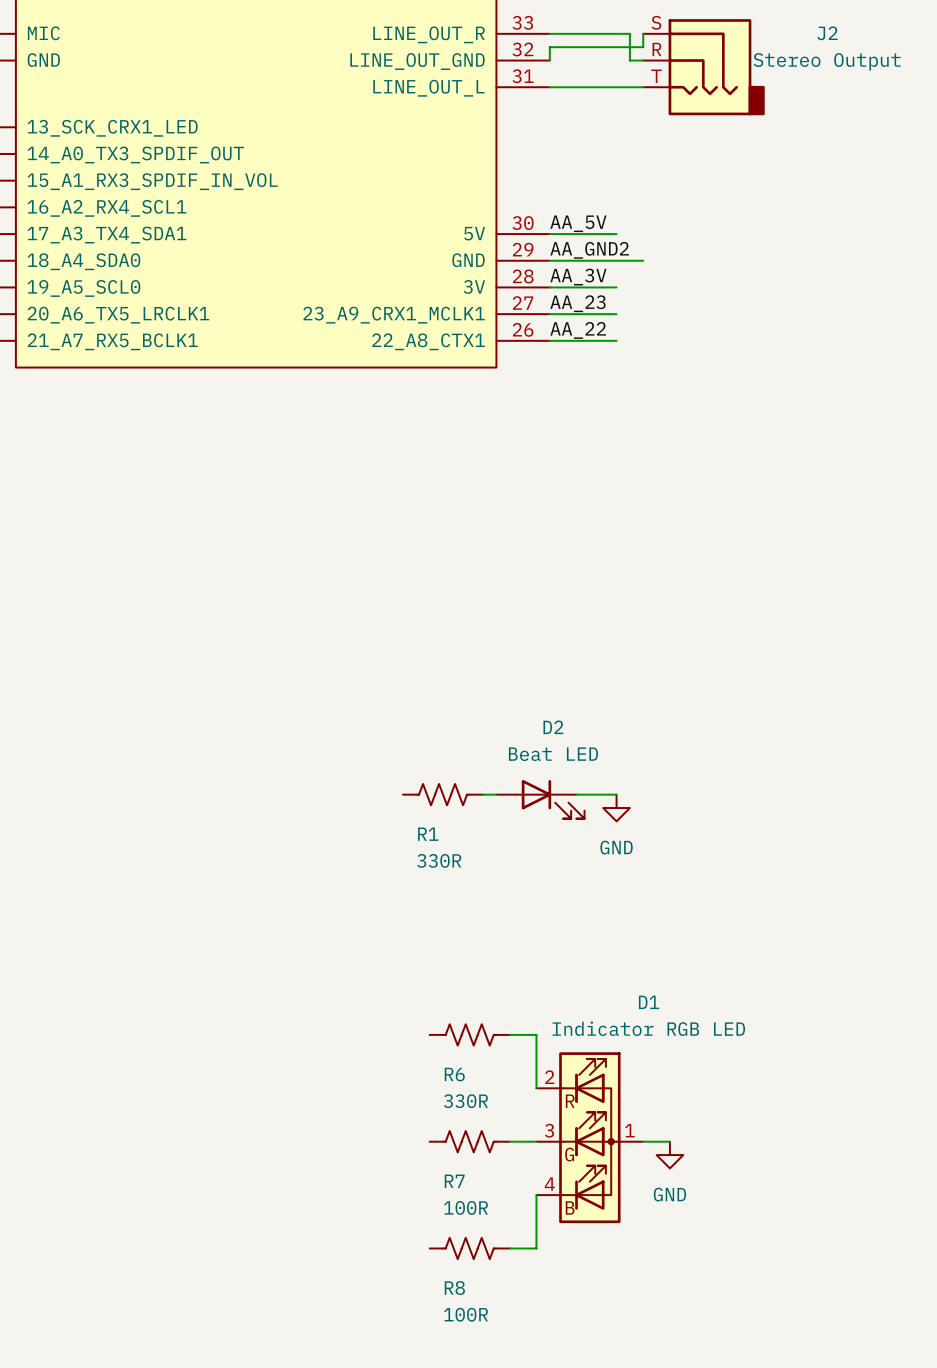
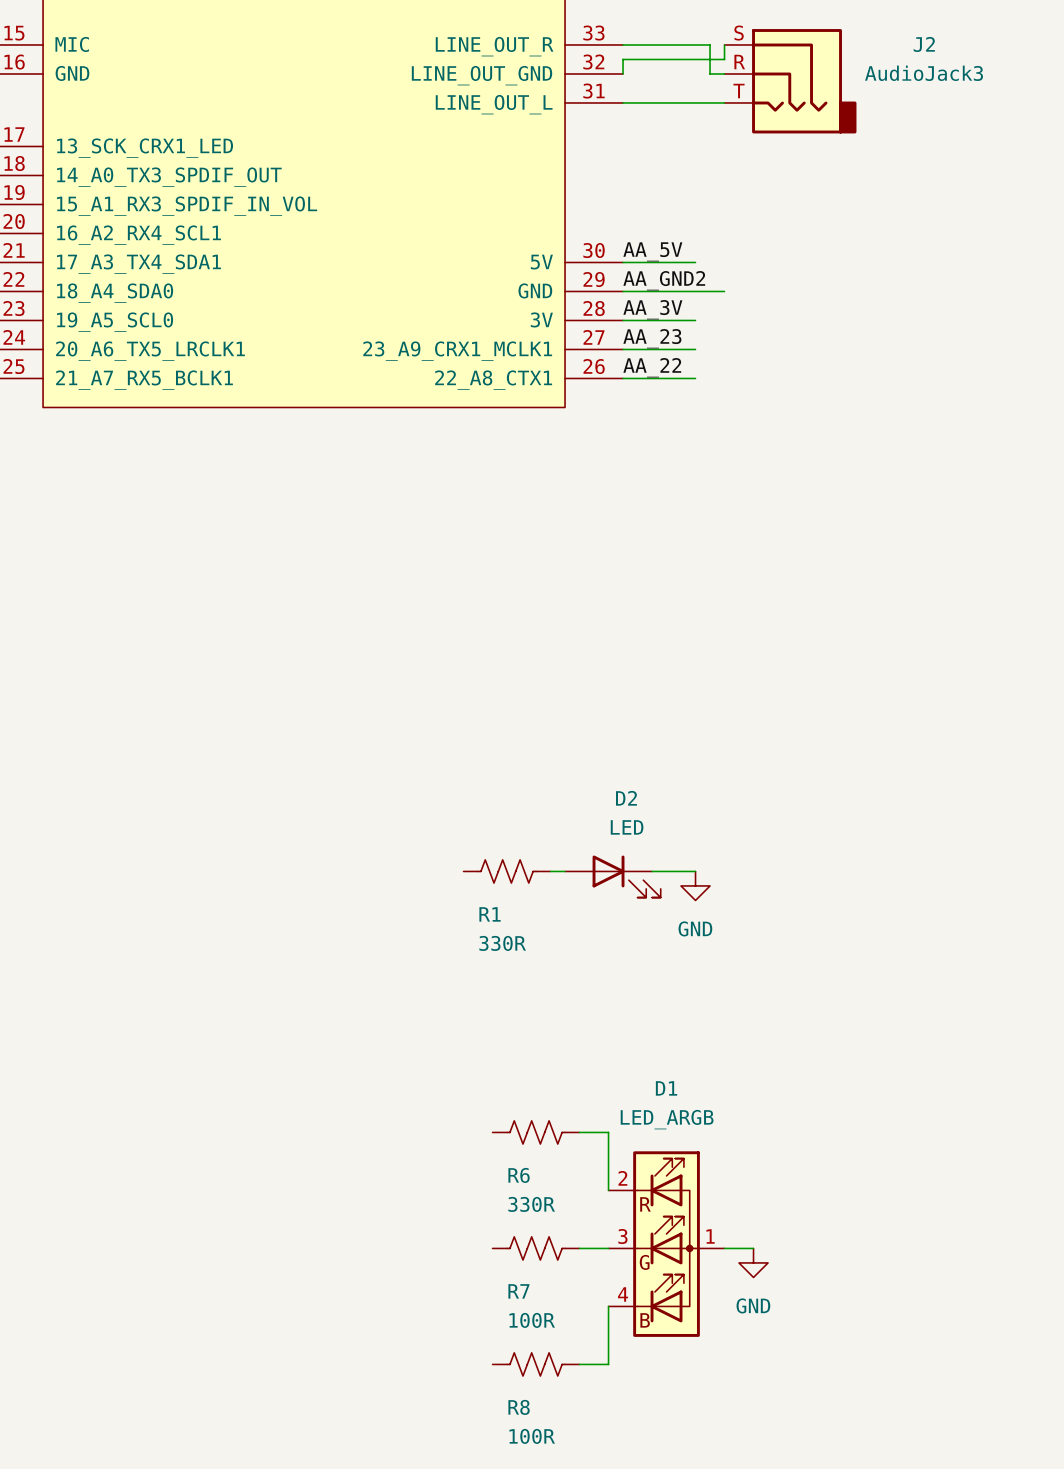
J2 value: Stereo Output (827, 61) -> AudioJack3 (924, 73)
D2 value: Beat LED (553, 754) -> LED (627, 827)
D1 name position: D1 (649, 1002) -> D1 (666, 1088)
D1 value: Indicator RGB LED (648, 1028) -> LED_ARGB (667, 1119)

